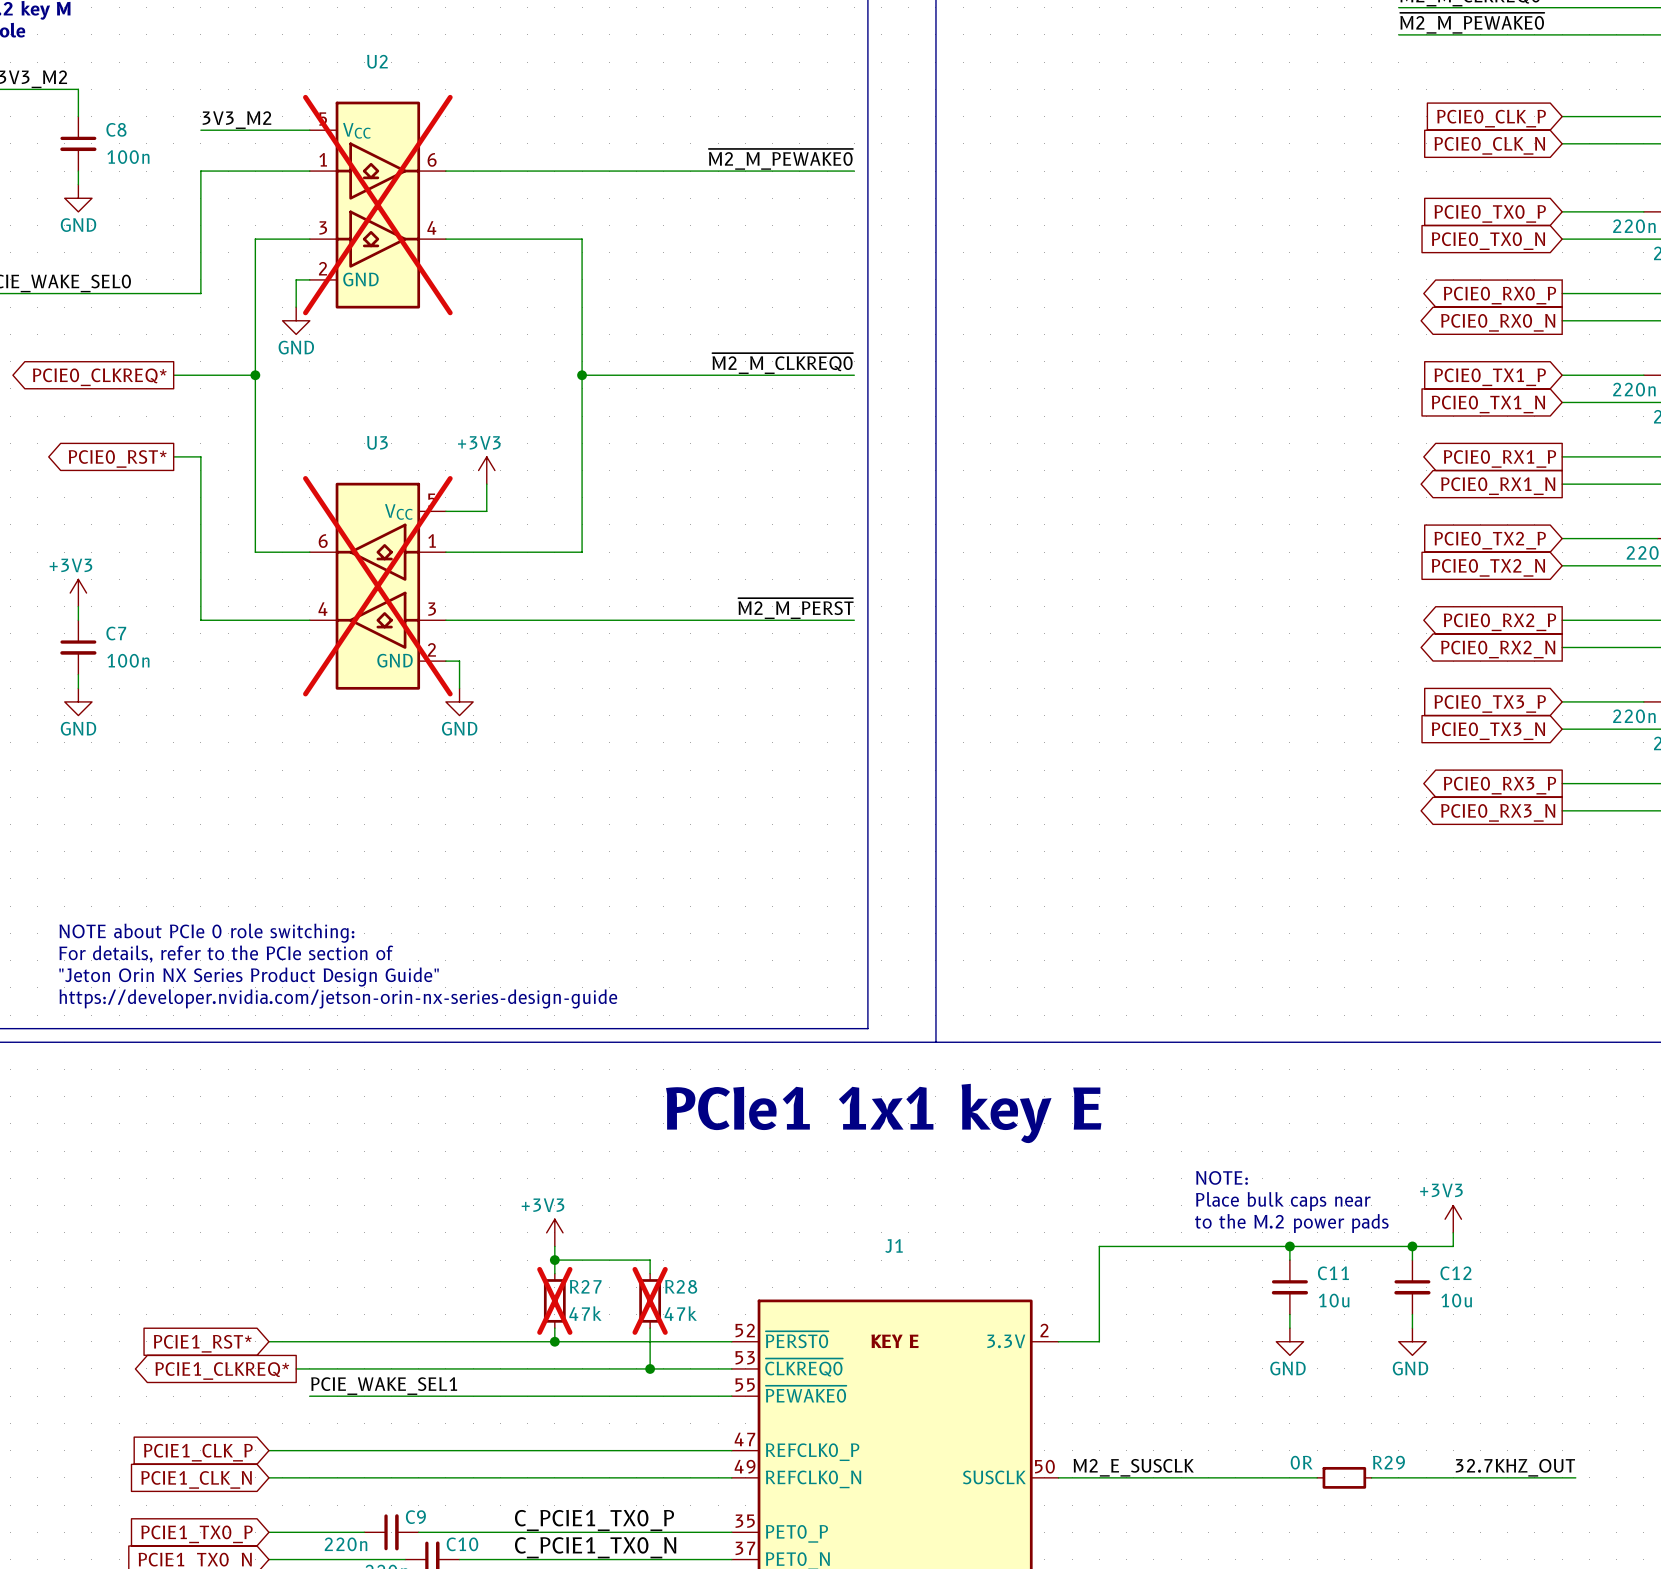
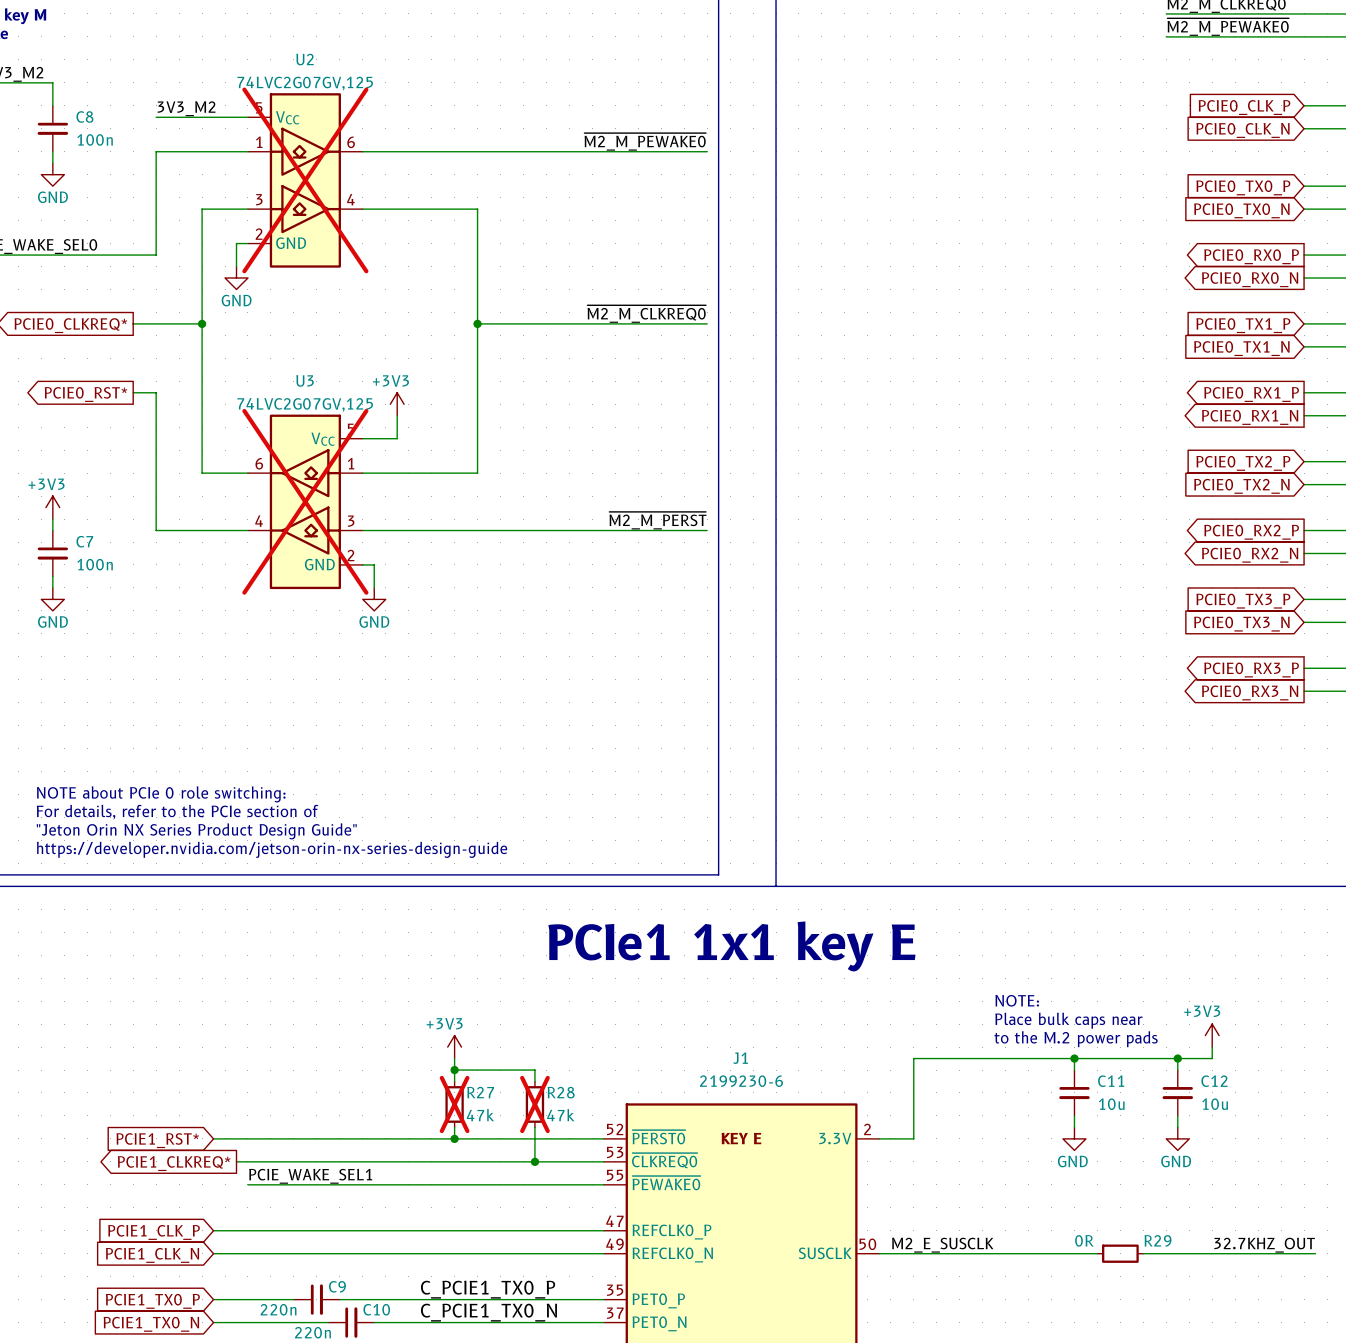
U2 text: none -> 74LVC2G07GV,125 (305, 83)
U3 text: none -> 74LVC2G07GV,125 (305, 404)
J1 text: none -> 2199230-6 (741, 1081)

